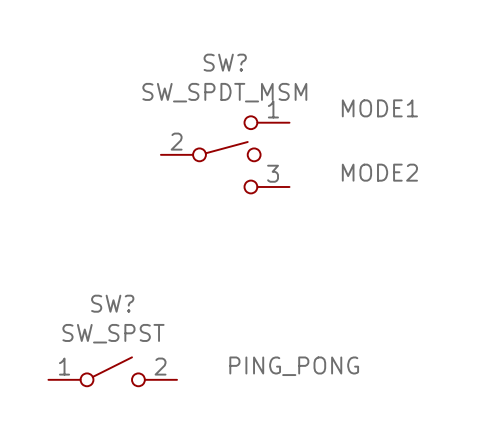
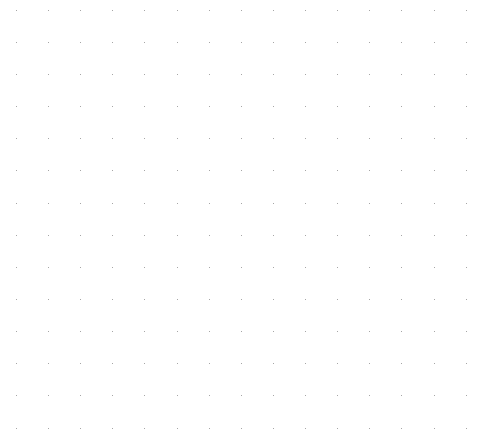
label: MODE1 (379, 108) -> none
SW?: SW_SPDT_MSM (225, 154) -> none
label: MODE2 (379, 172) -> none
label: PING_PONG (294, 366) -> none
SW?: SW_SPST (112, 371) -> none

